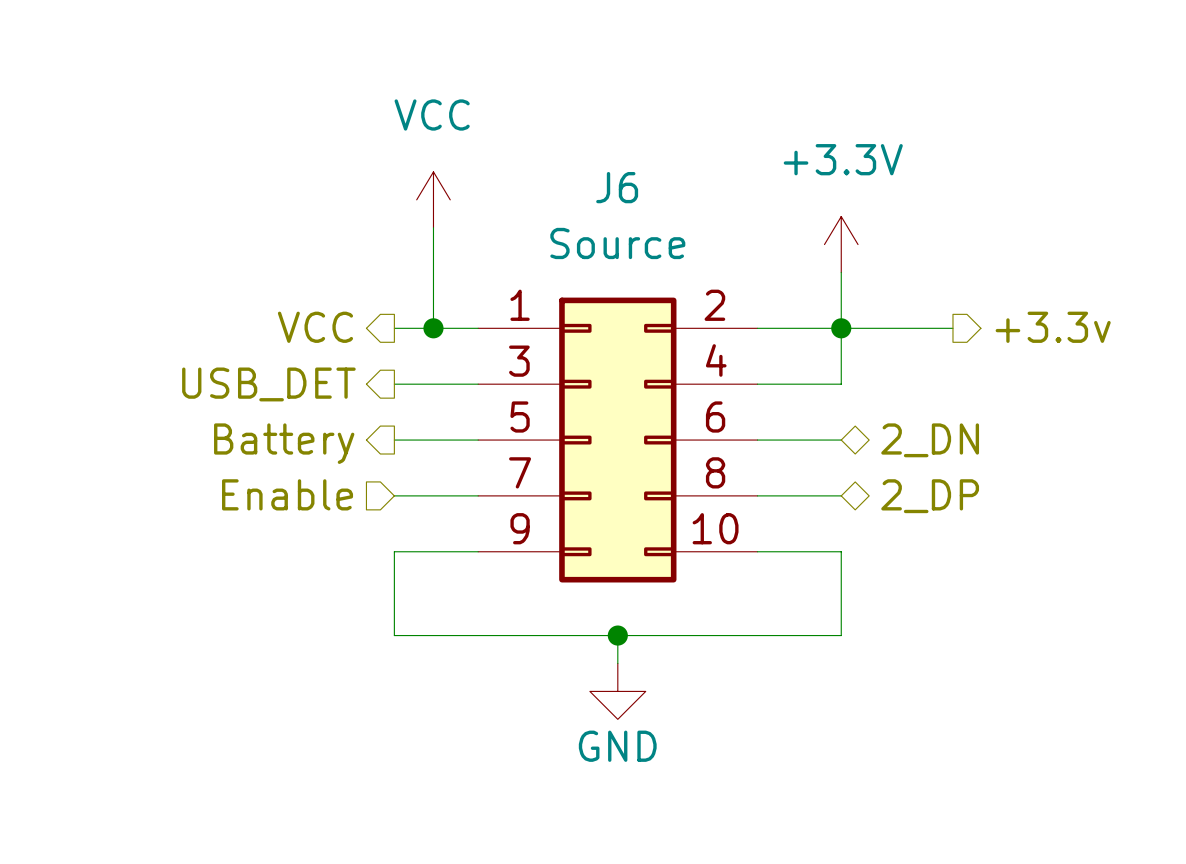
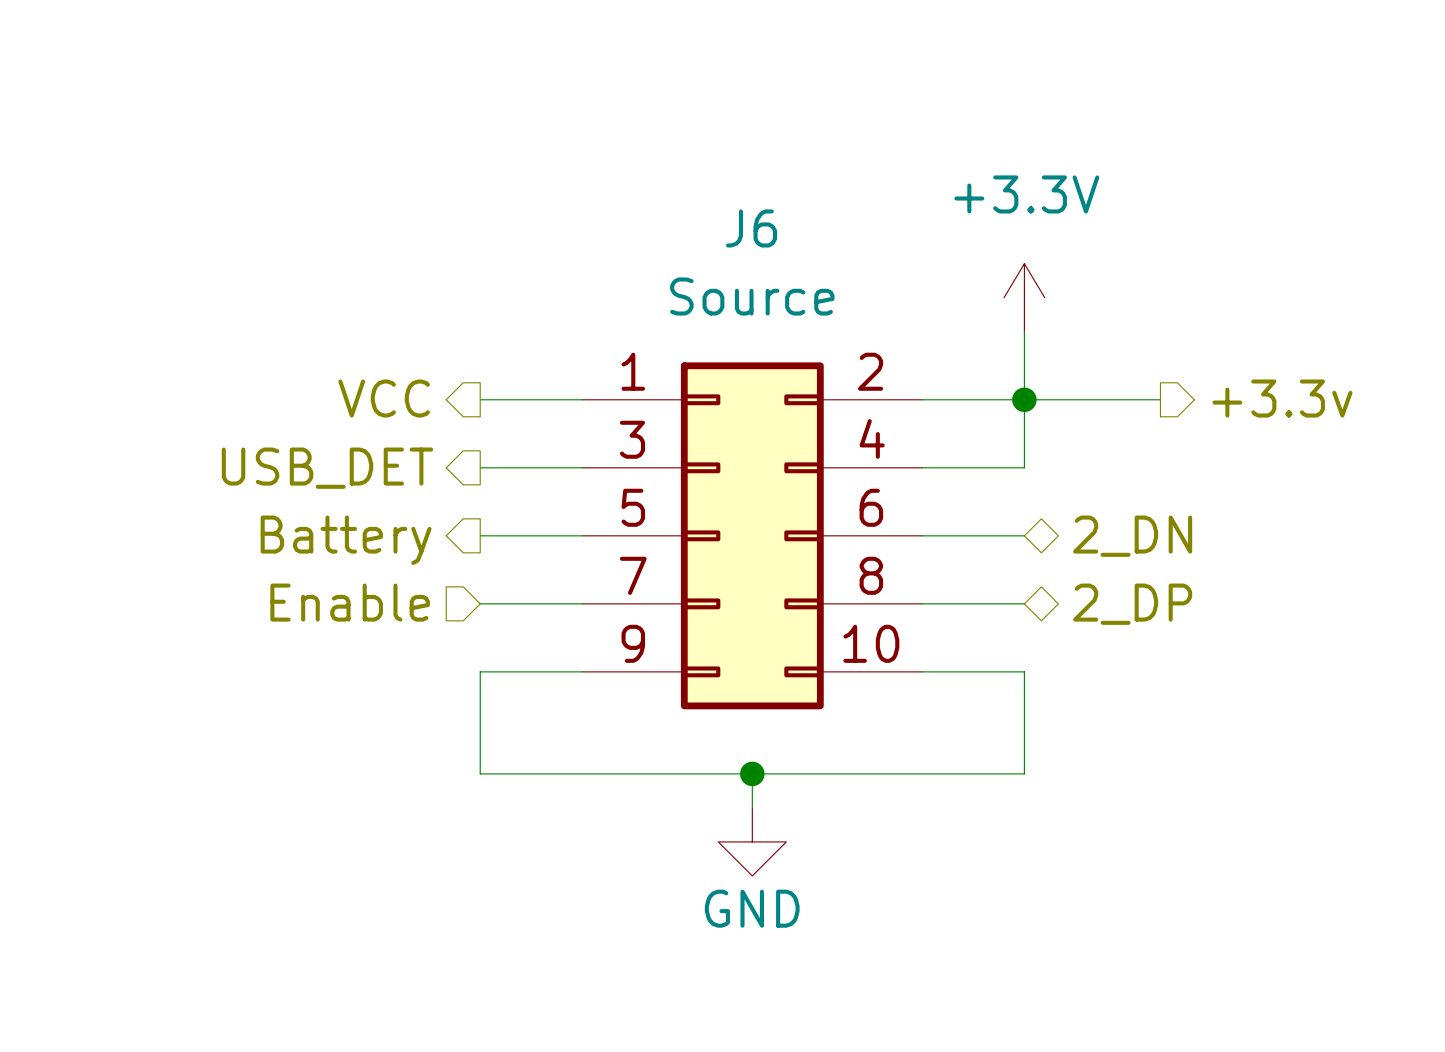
power symbol: VCC (433, 199) -> none
wire: (433, 227) (433, 328) -> none
junction: (433, 328) -> none

